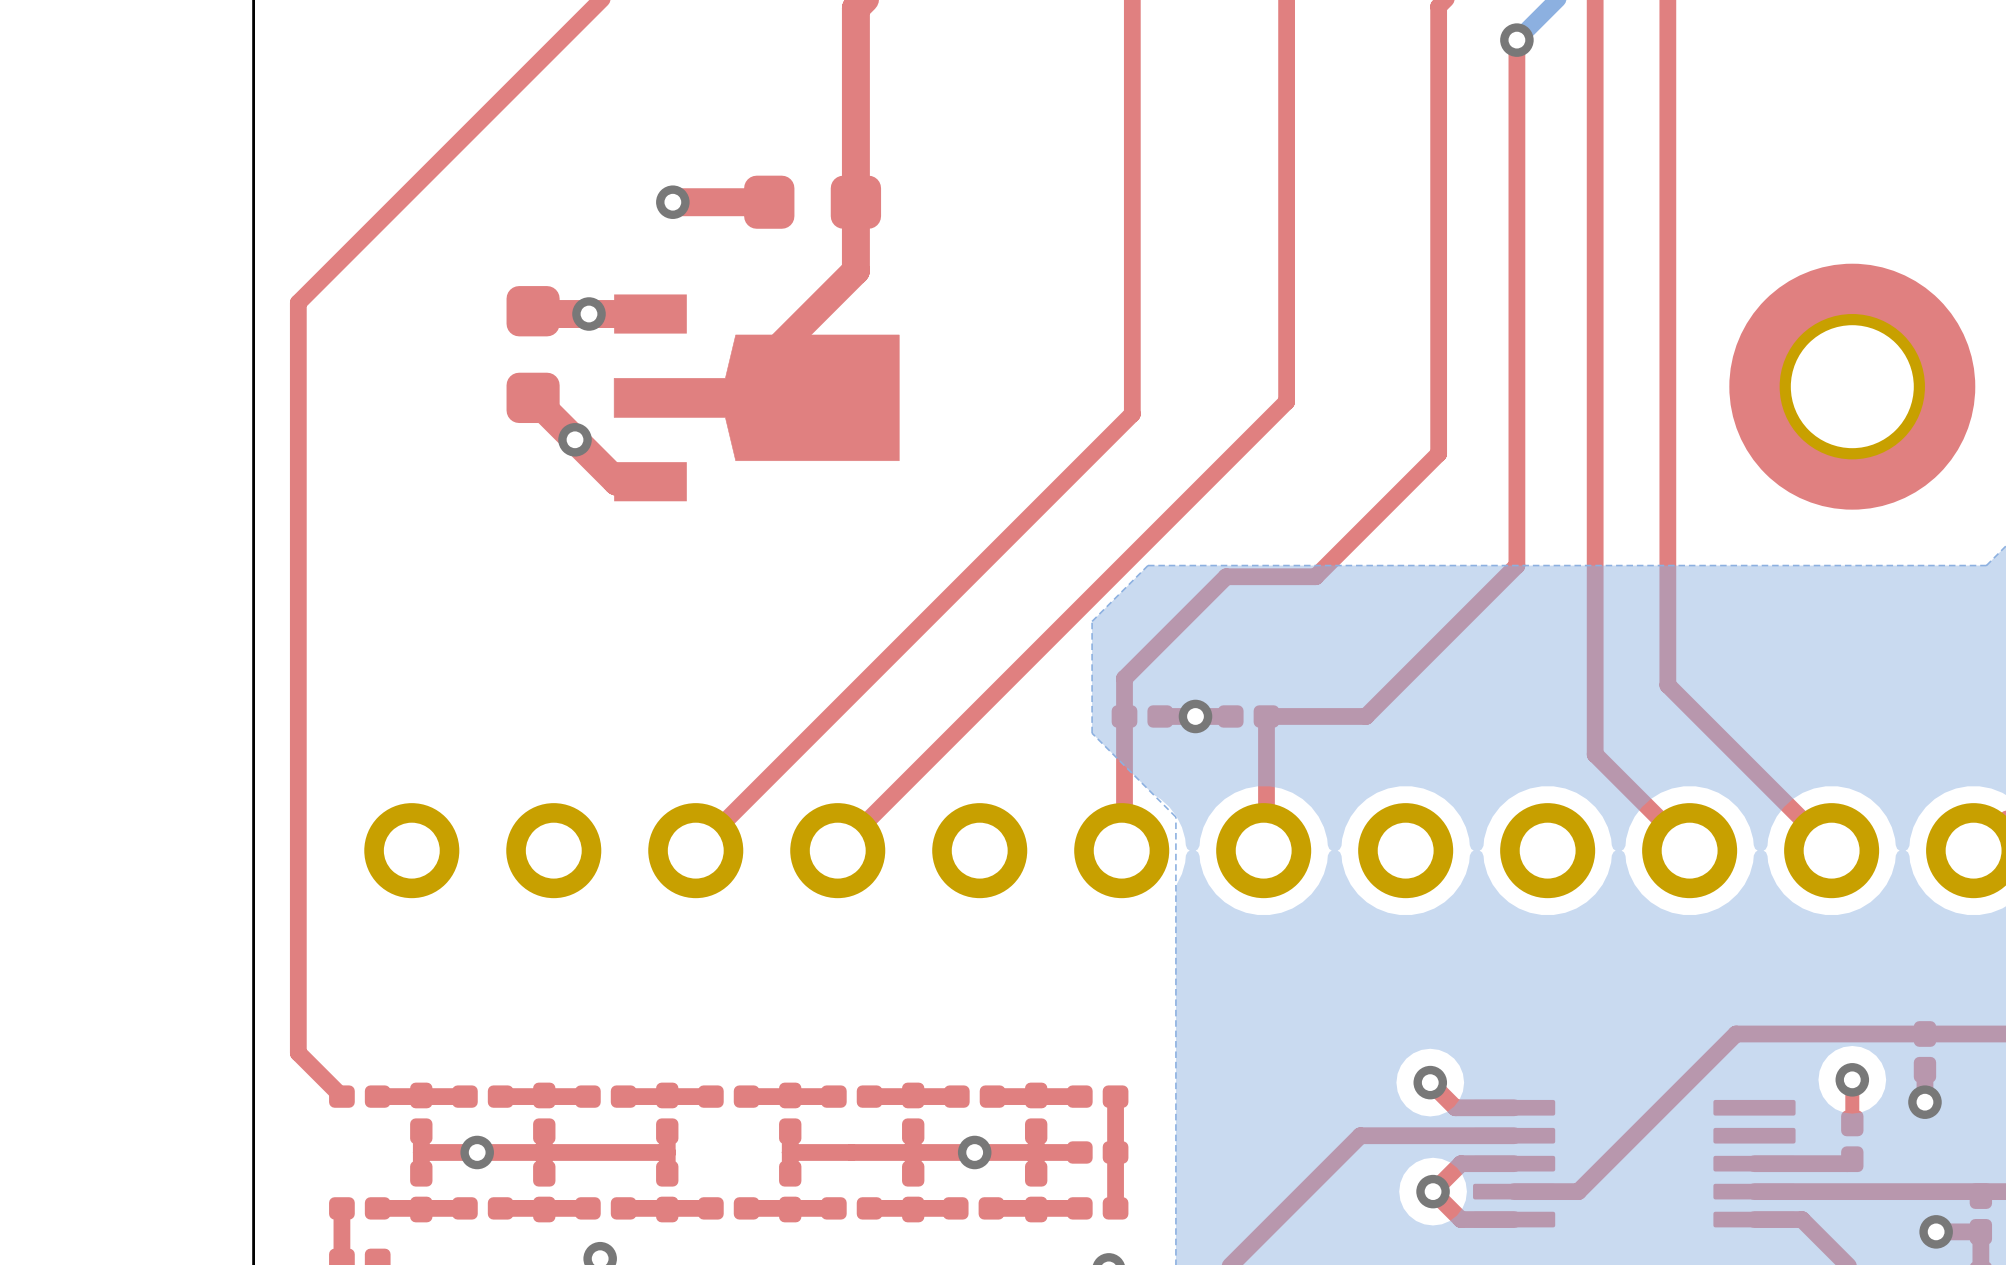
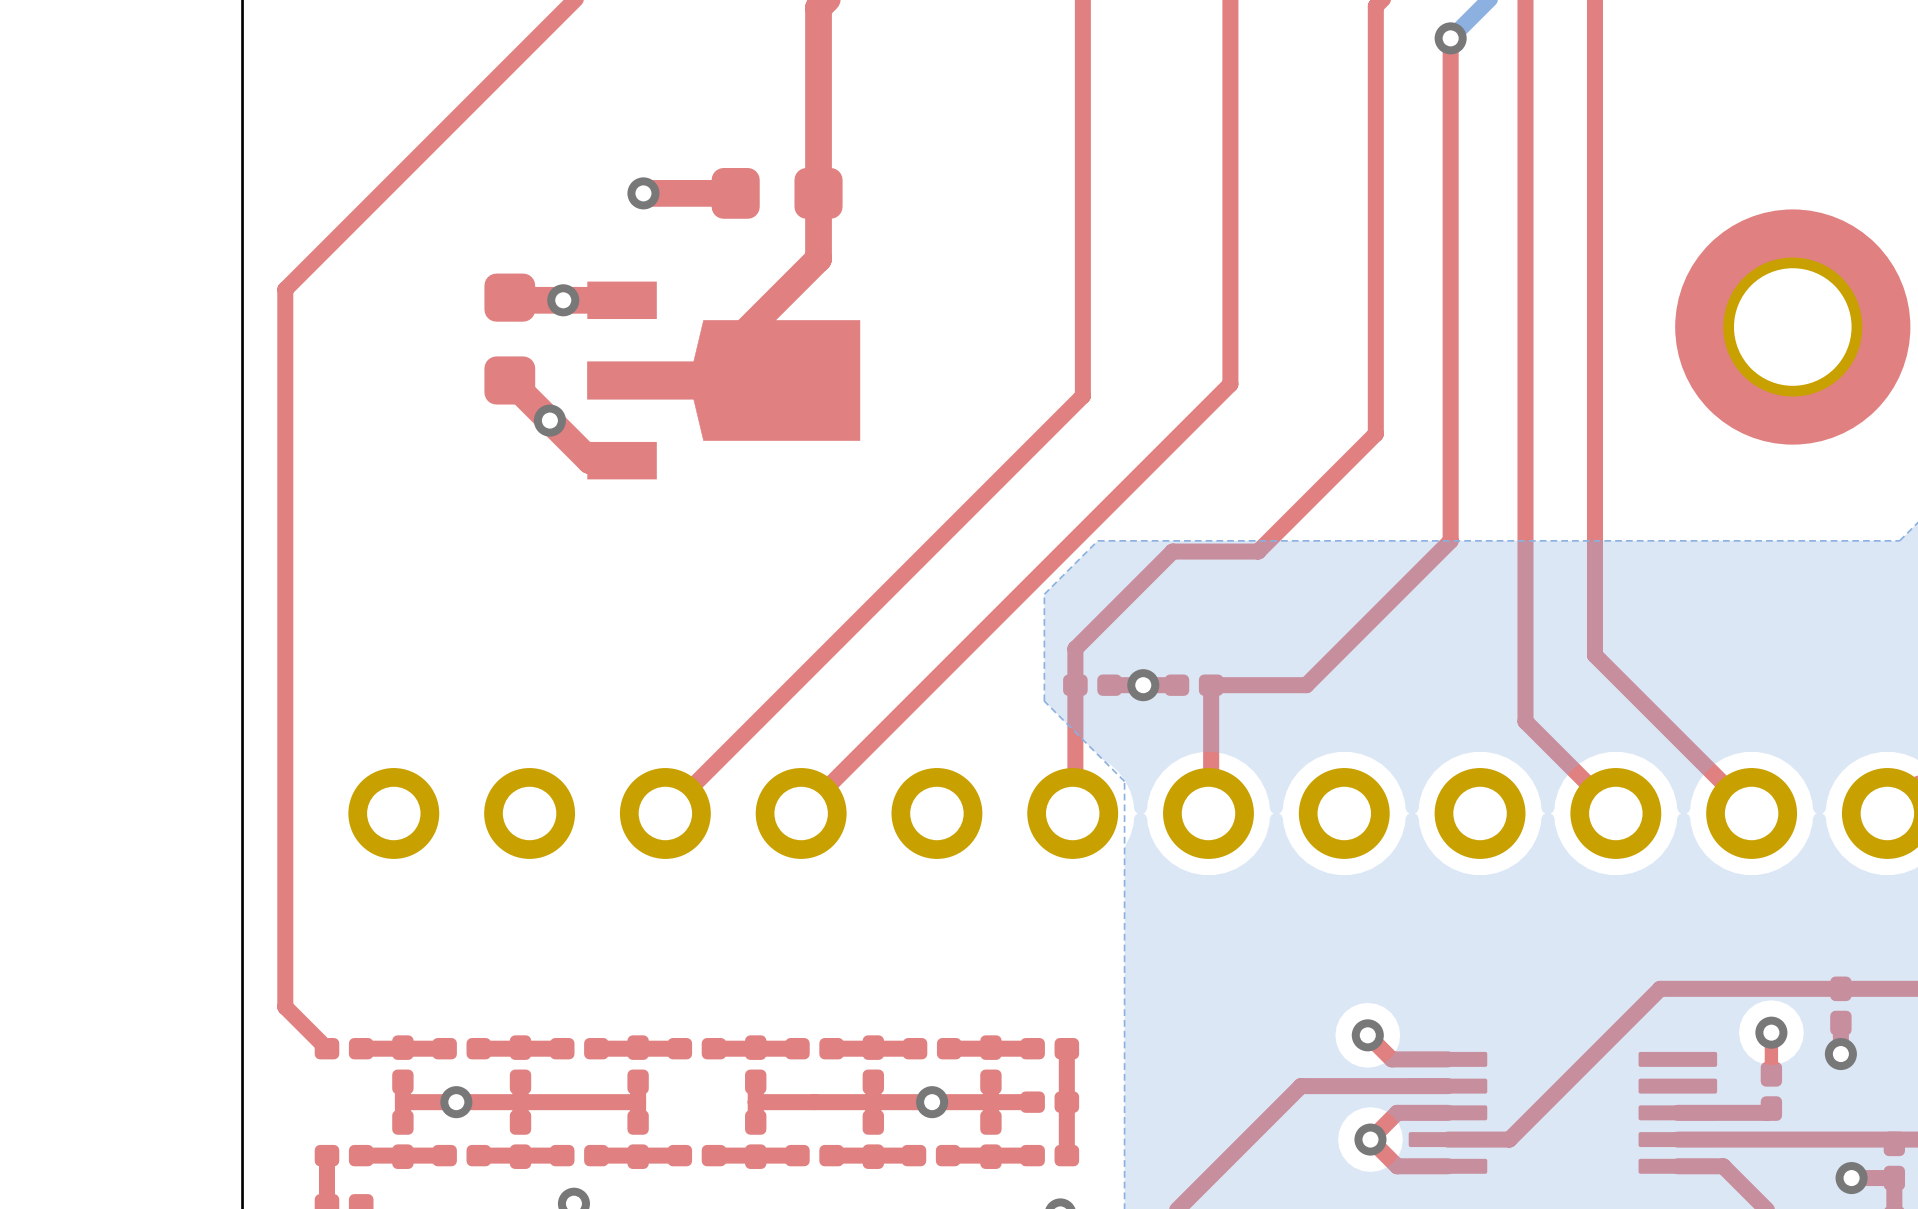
part position: (1852, 386) -> (1792, 327)

